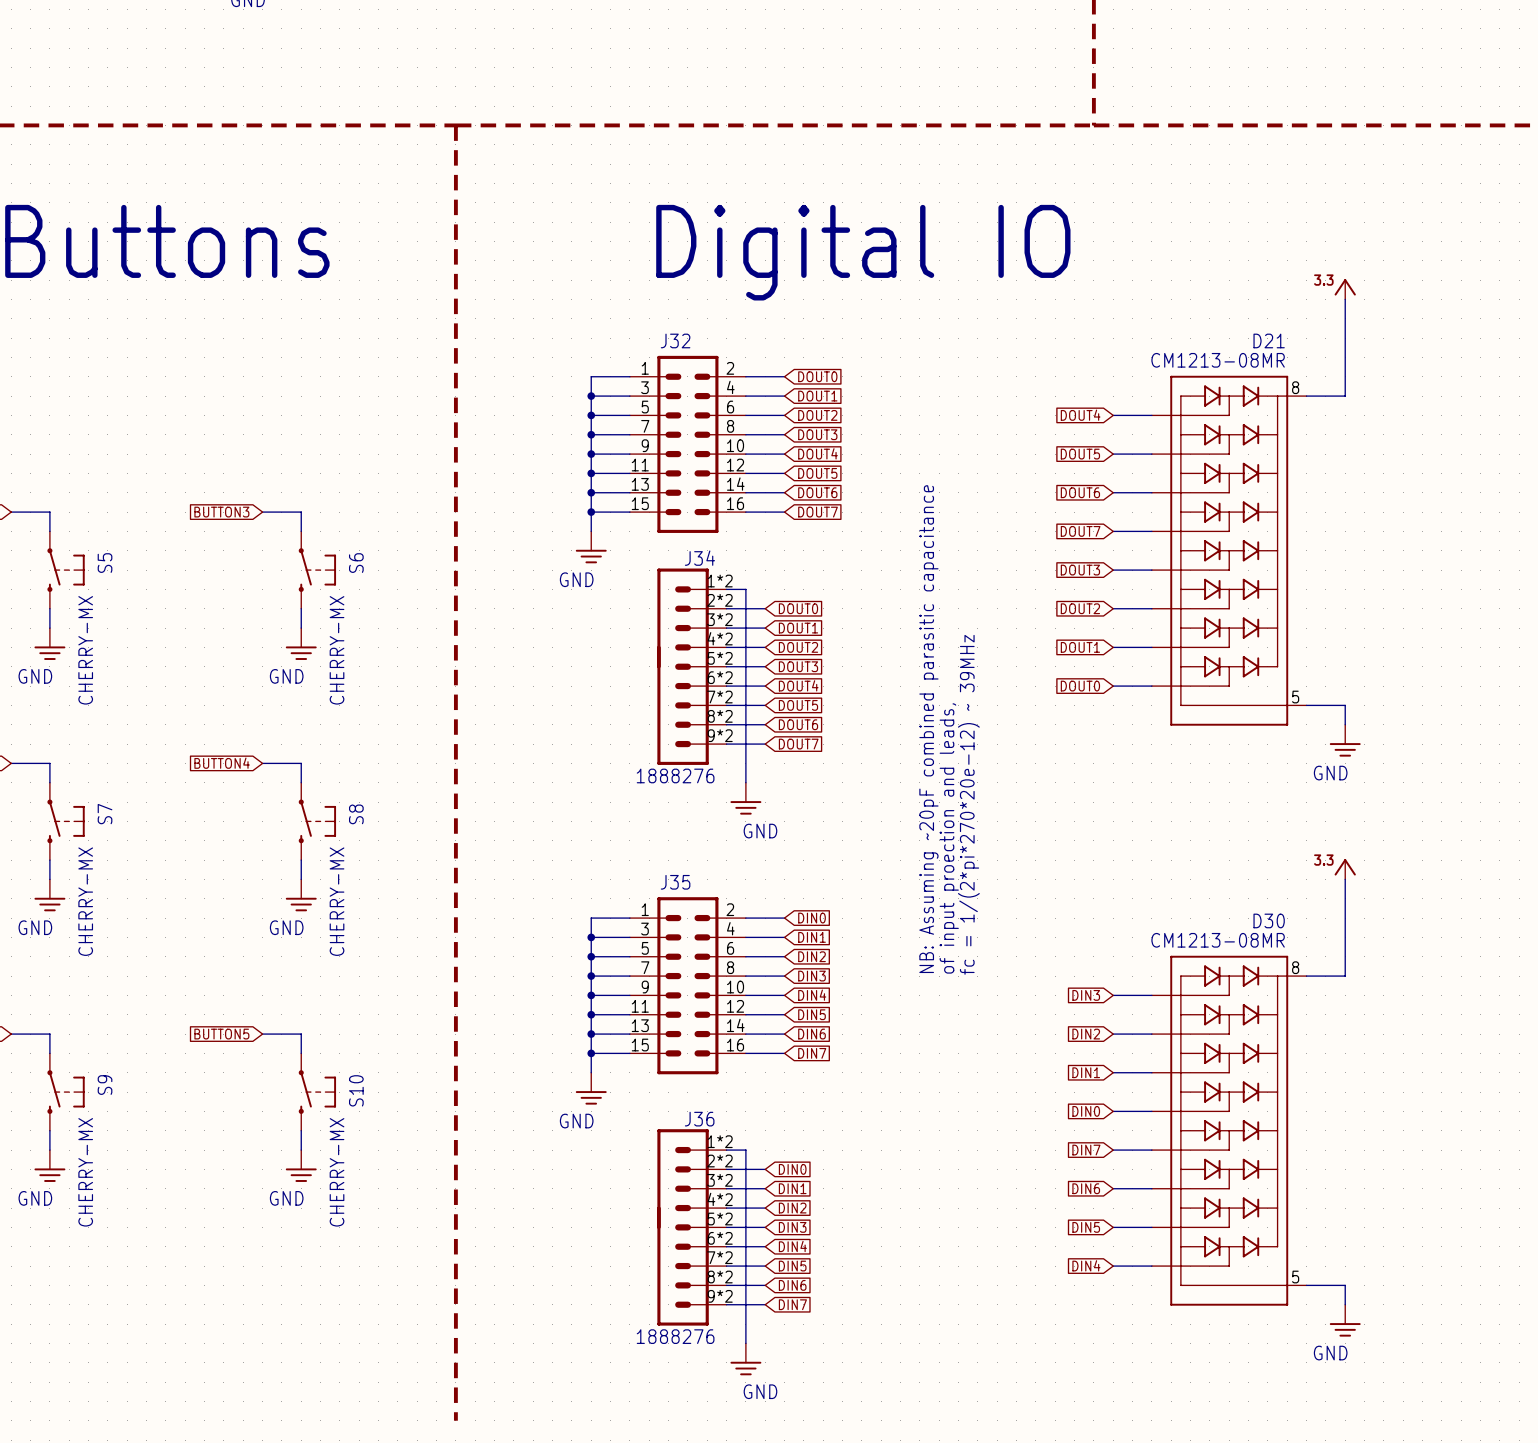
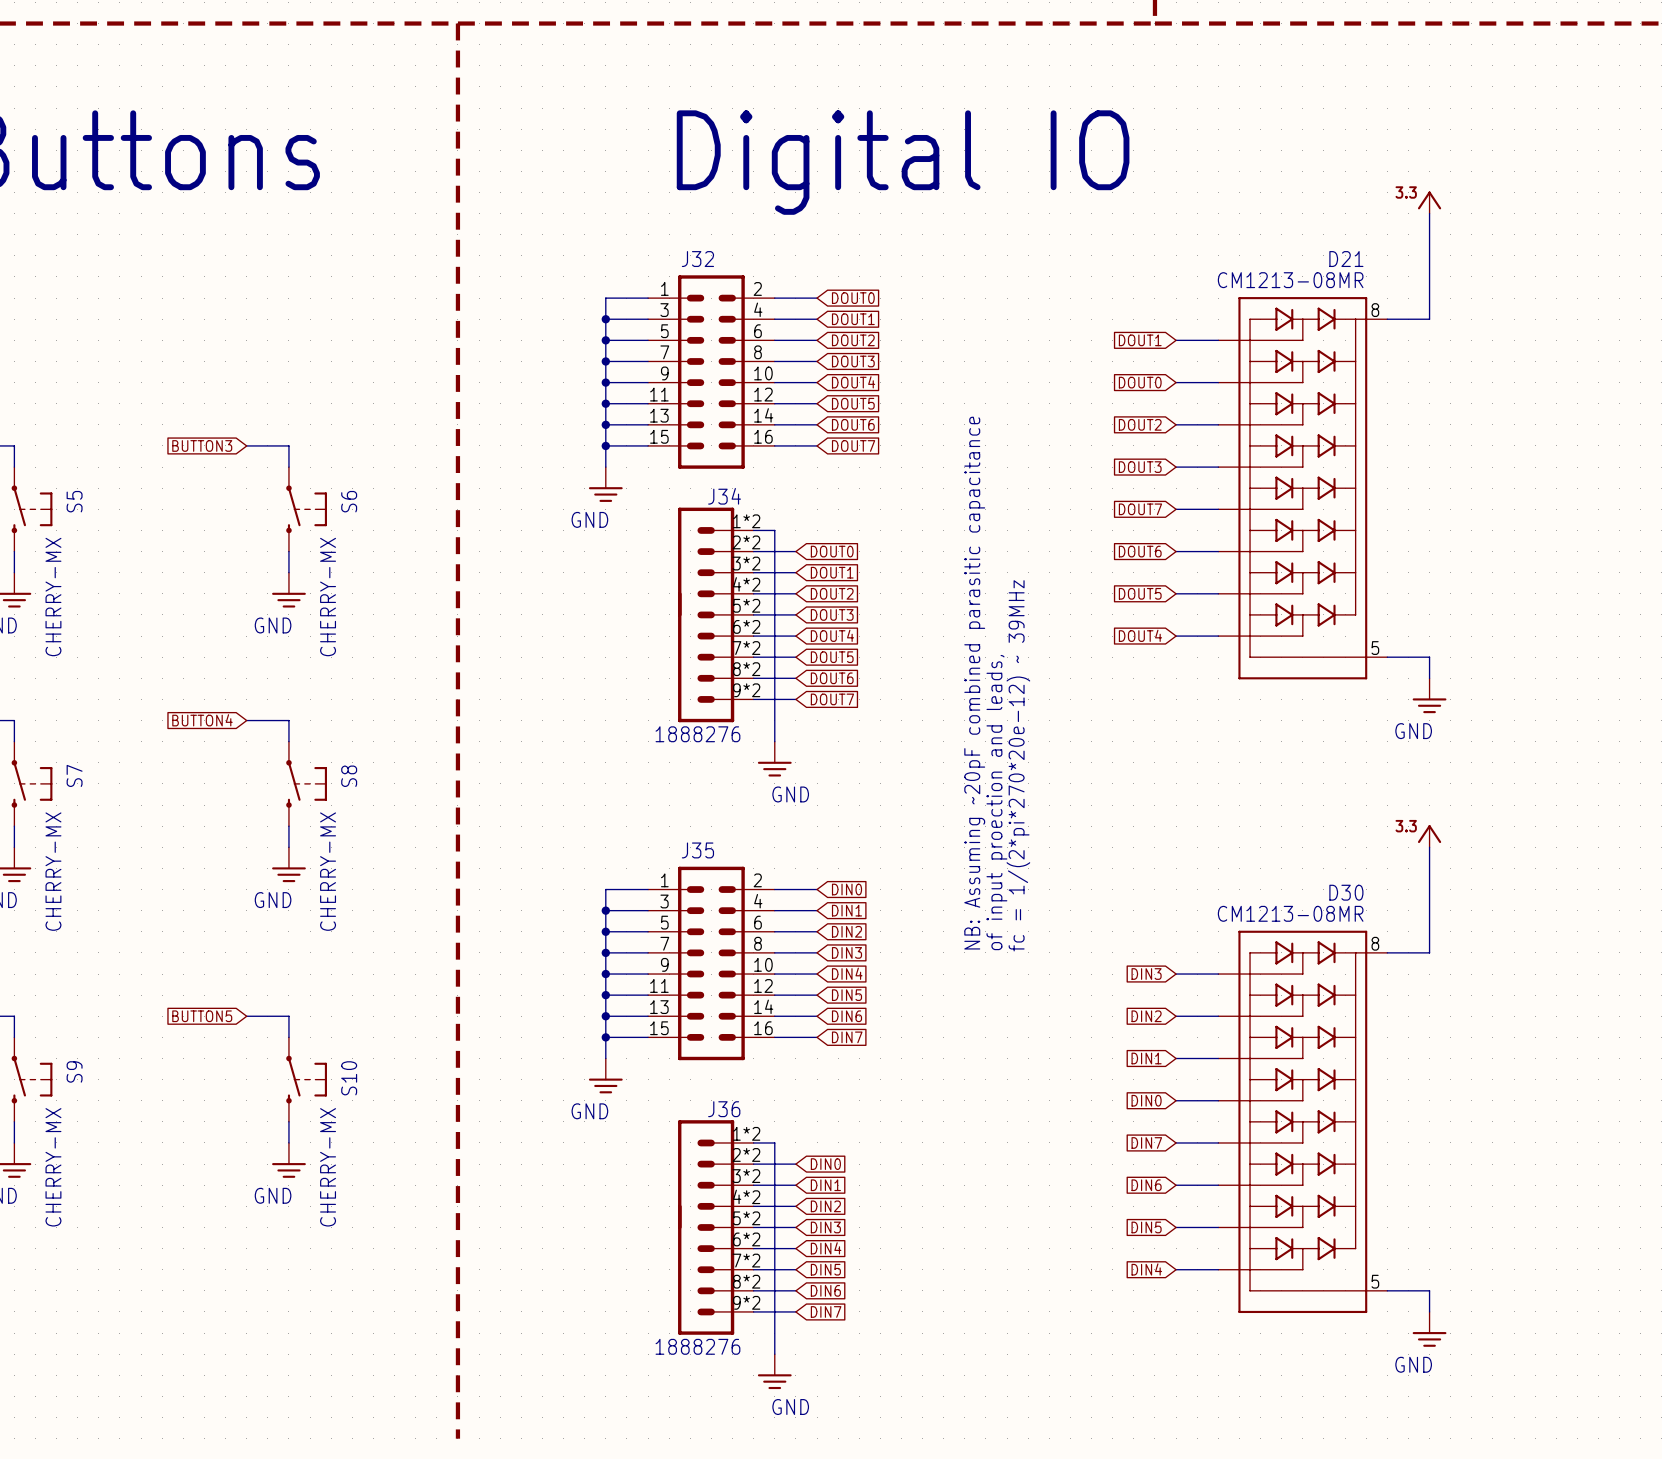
global label: DOUT4 (1080, 415) -> DOUT1 (1140, 340)
global label: DOUT5 (1080, 454) -> DOUT0 (1140, 382)
global label: DOUT6 (1080, 492) -> DOUT2 (1140, 424)
global label: DOUT7 (1080, 531) -> DOUT3 (1140, 467)
global label: DOUT3 (1080, 570) -> DOUT7 (1140, 509)
global label: DOUT2 (1080, 608) -> DOUT6 (1140, 551)
global label: DOUT1 (1080, 647) -> DOUT5 (1140, 593)
global label: DOUT0 (1080, 686) -> DOUT4 (1140, 635)

